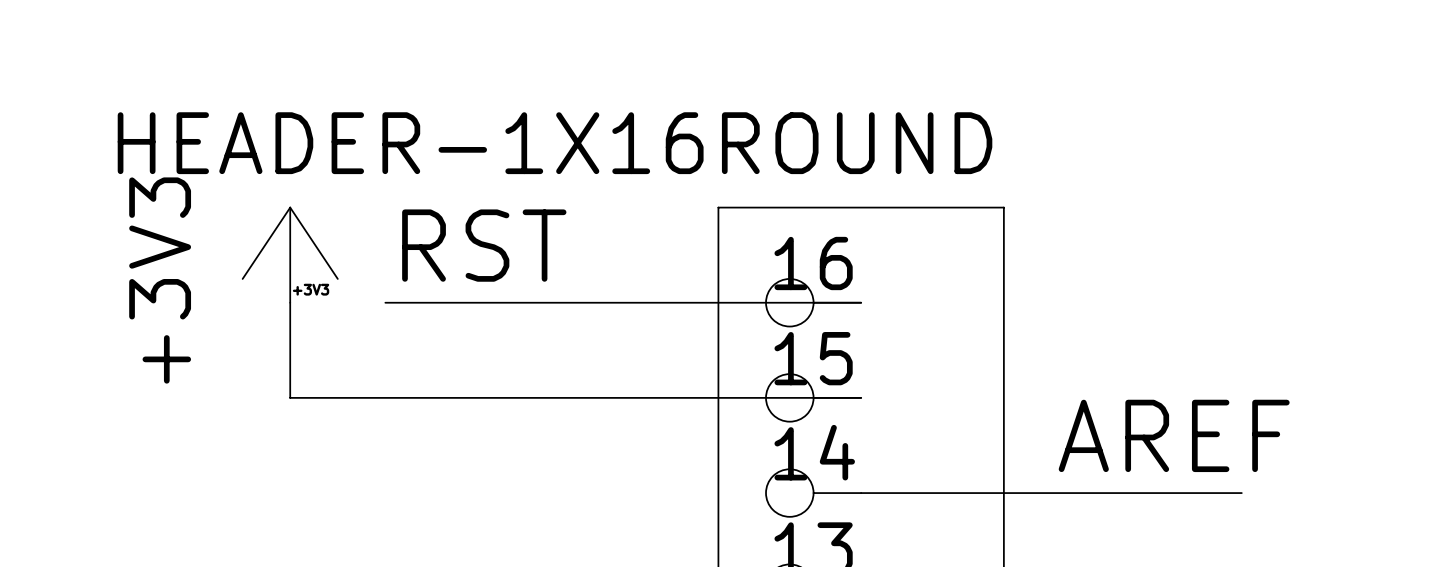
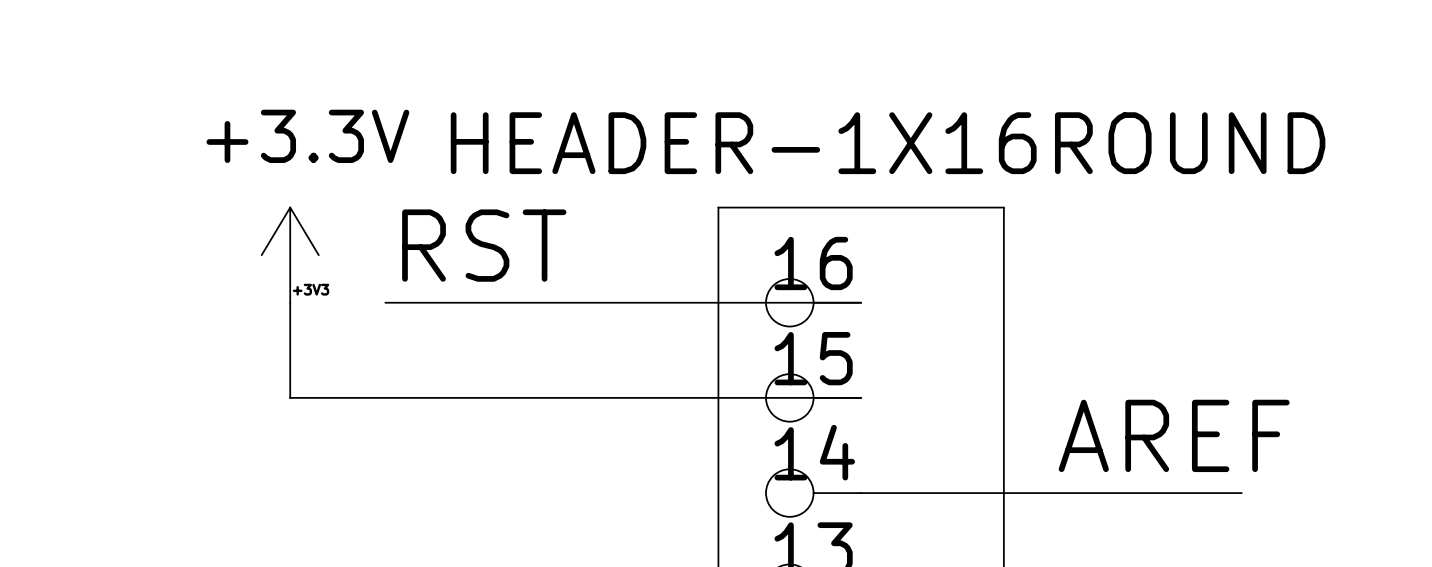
part value position: HEADER-1X16ROUND (555, 143) -> HEADER-1X16ROUND (888, 143)
power symbol: +3V3 (290, 255) -> +3.3V (290, 255)

